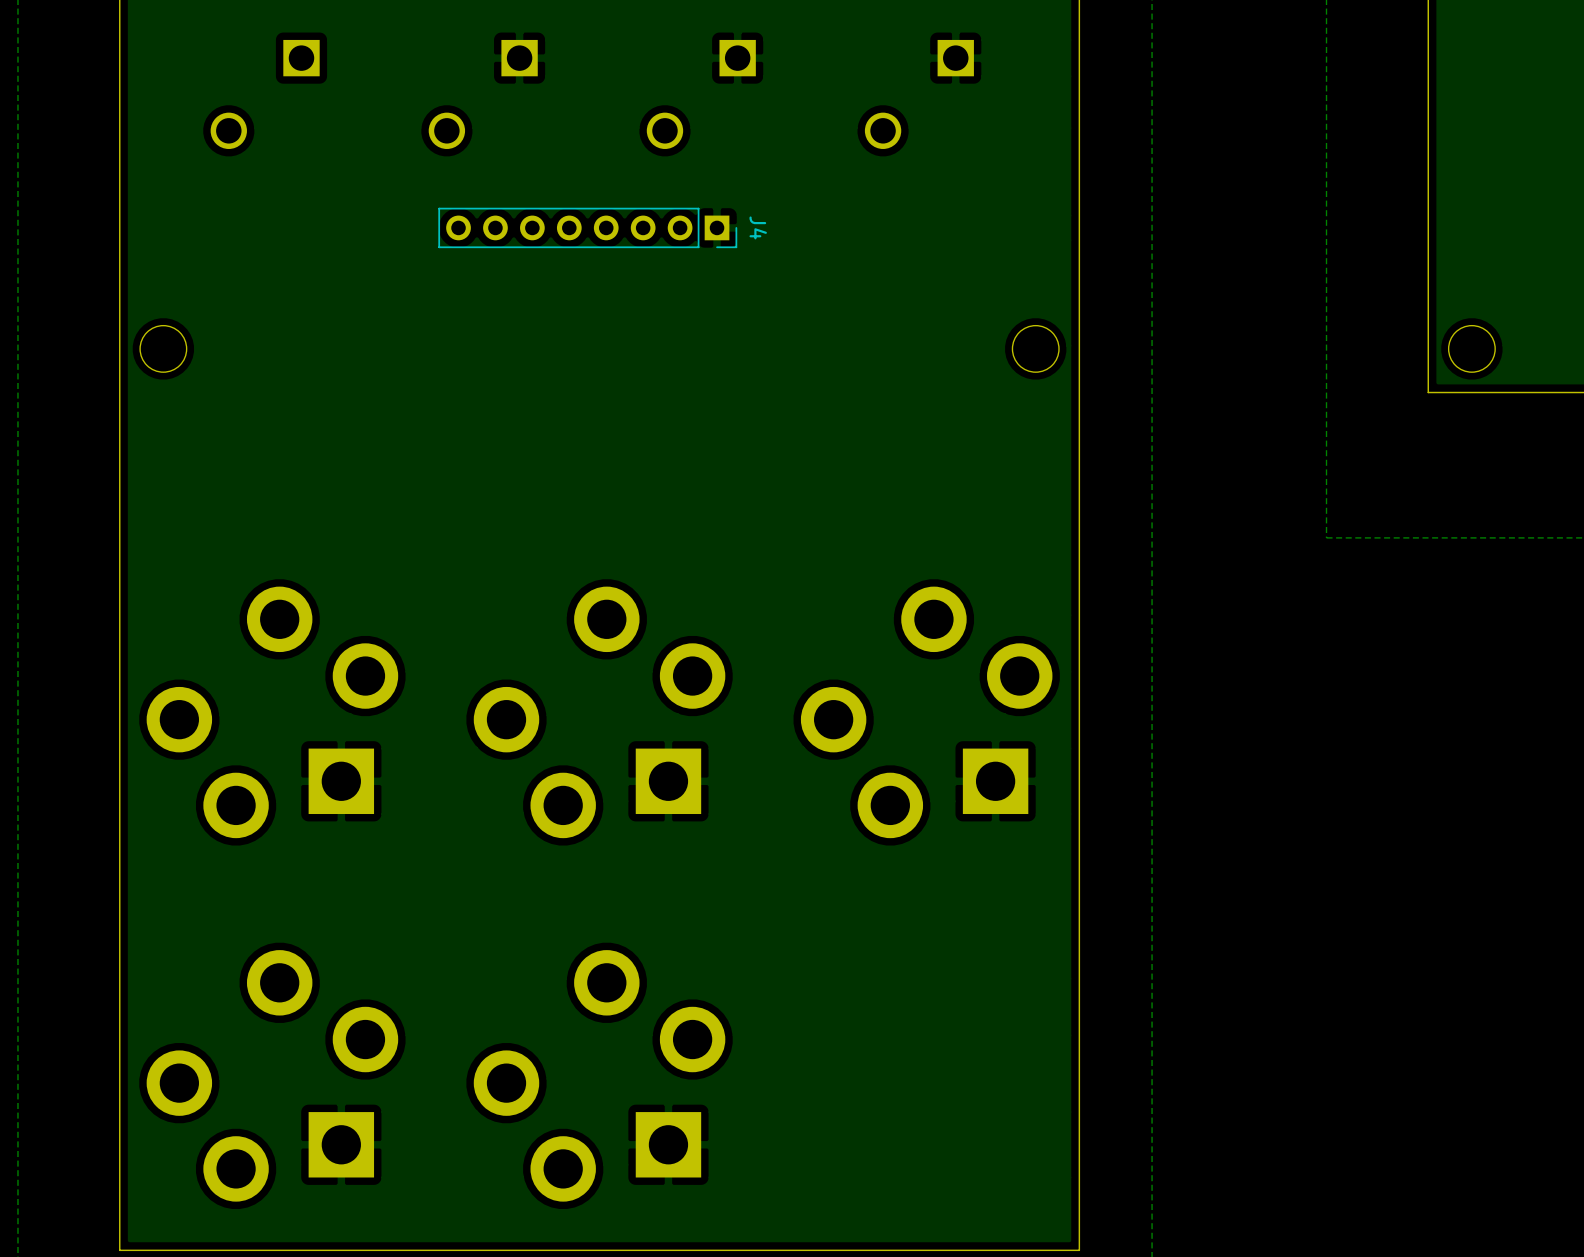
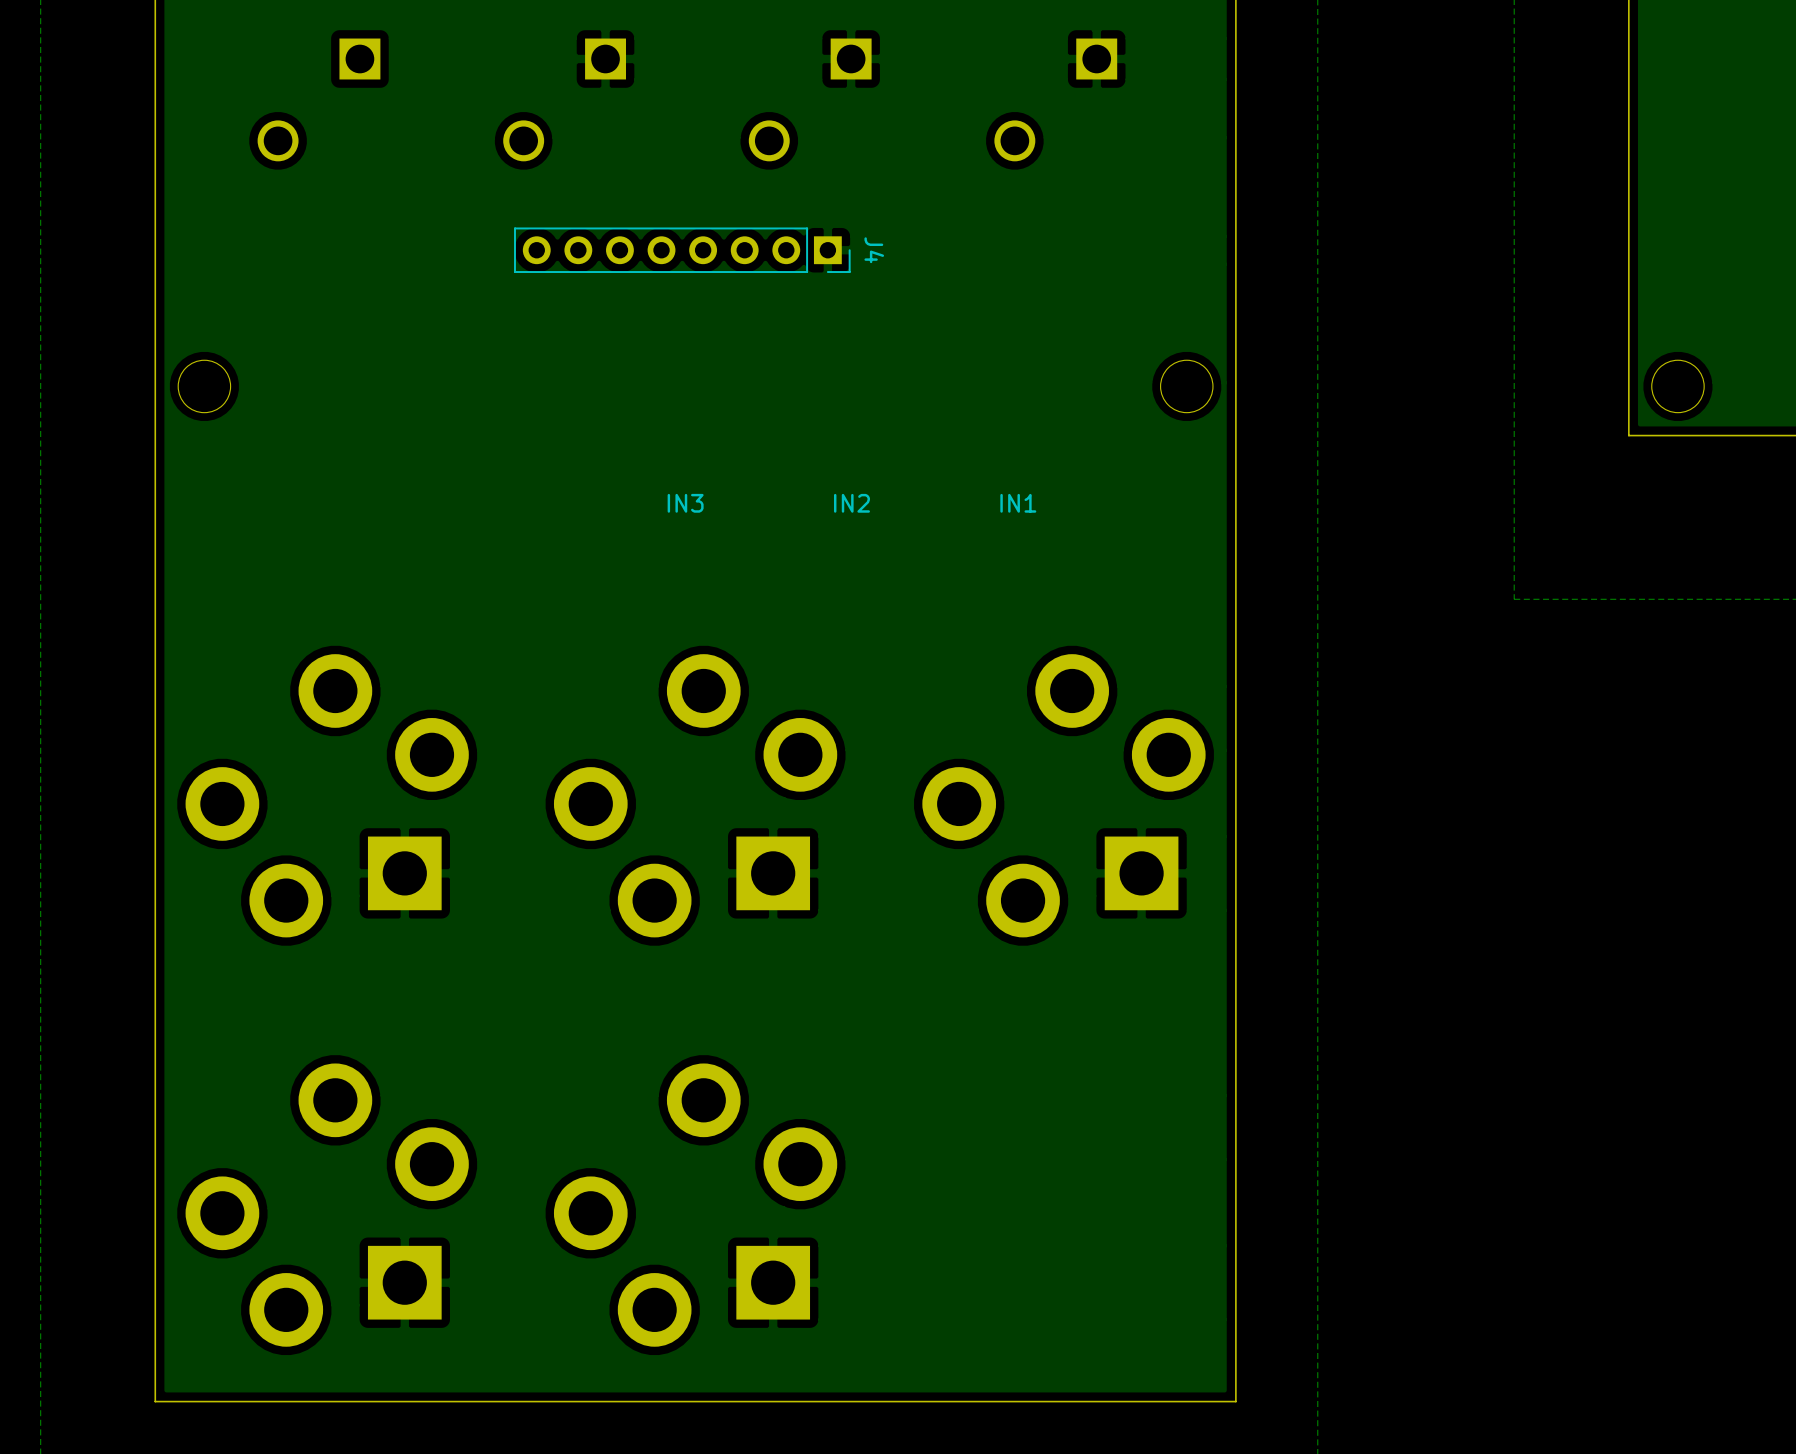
text: none -> IN3 (685, 503)
text: none -> IN2 (851, 503)
text: none -> IN1 (1018, 503)

